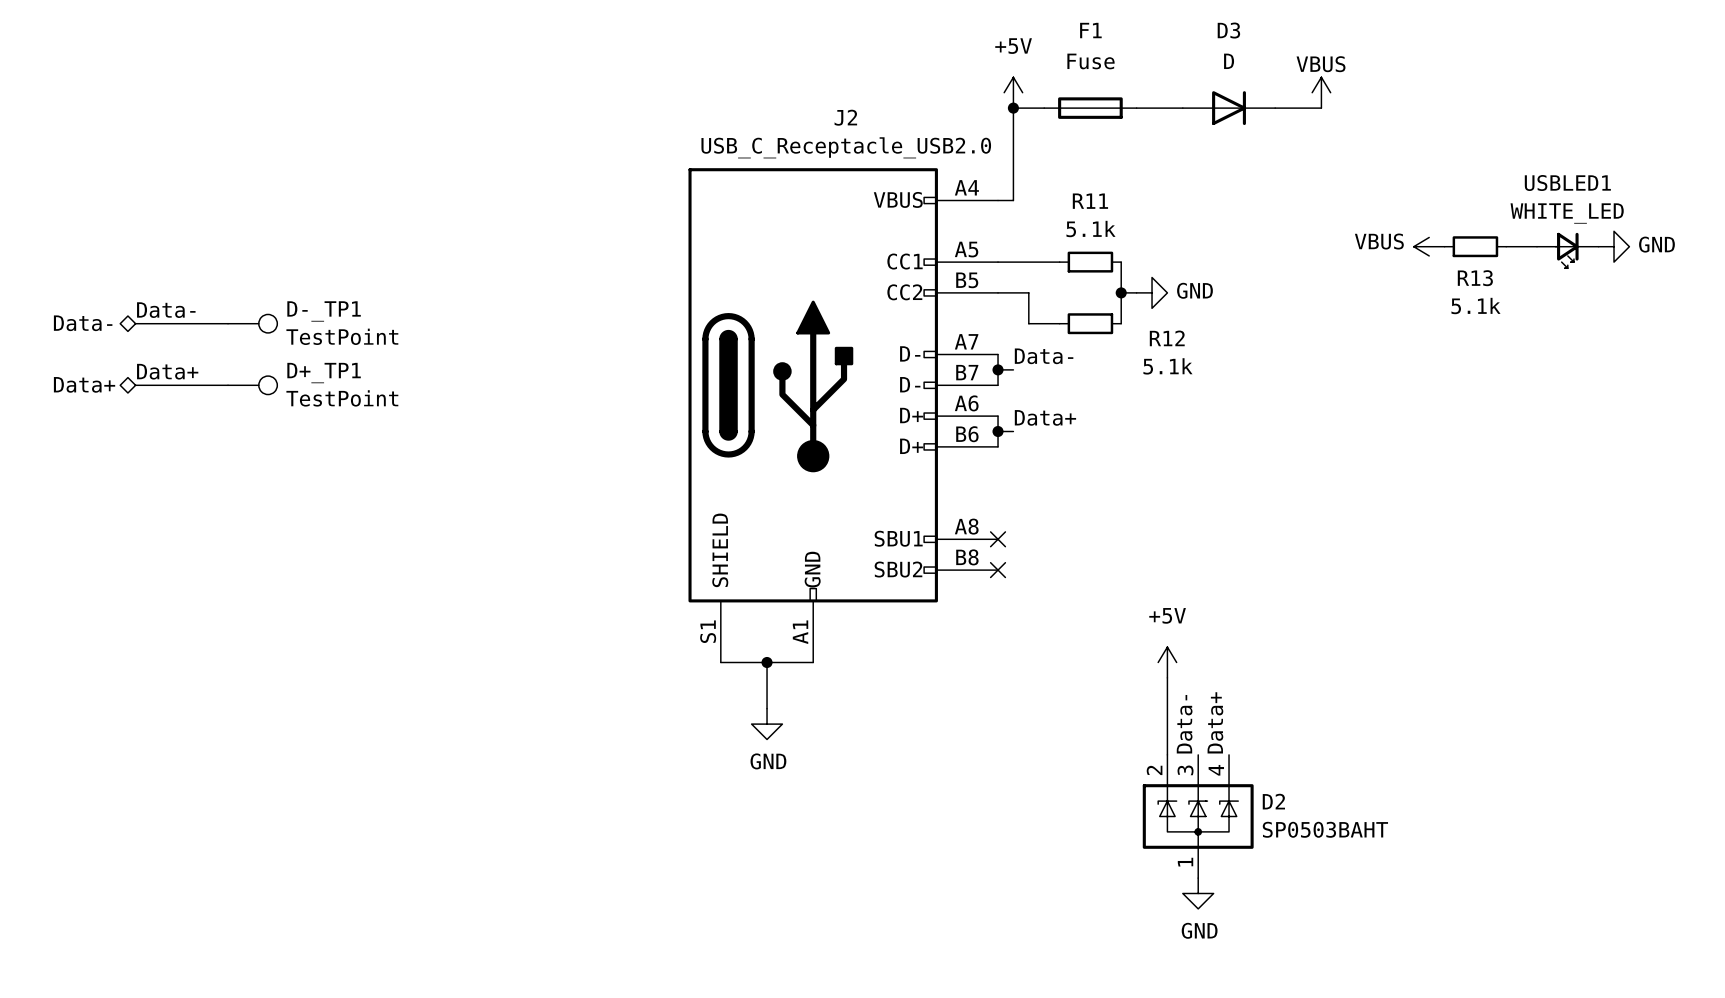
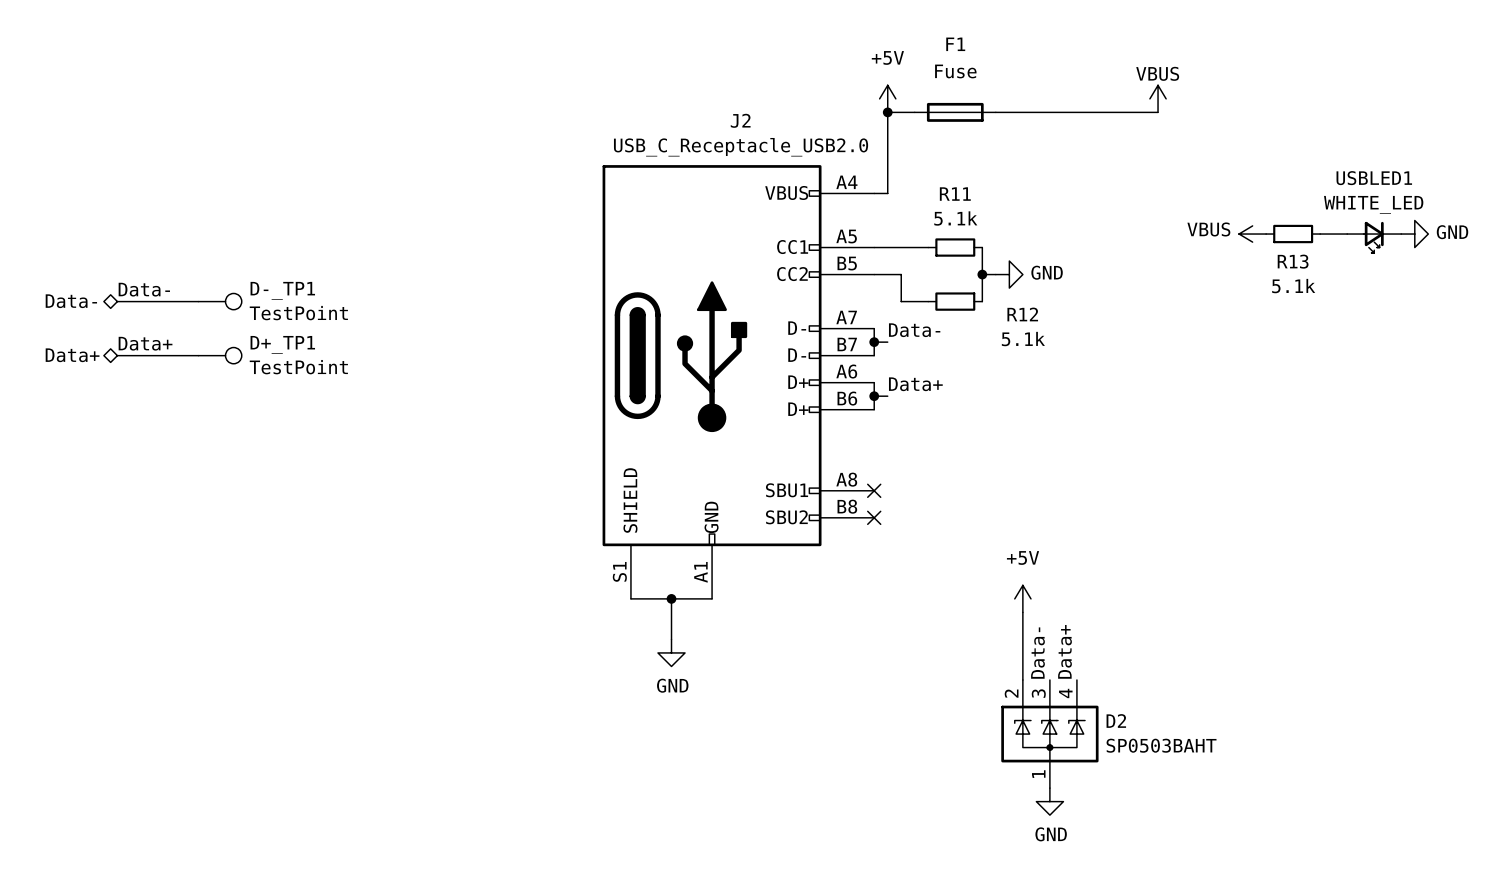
D3: D (1229, 108) -> none

